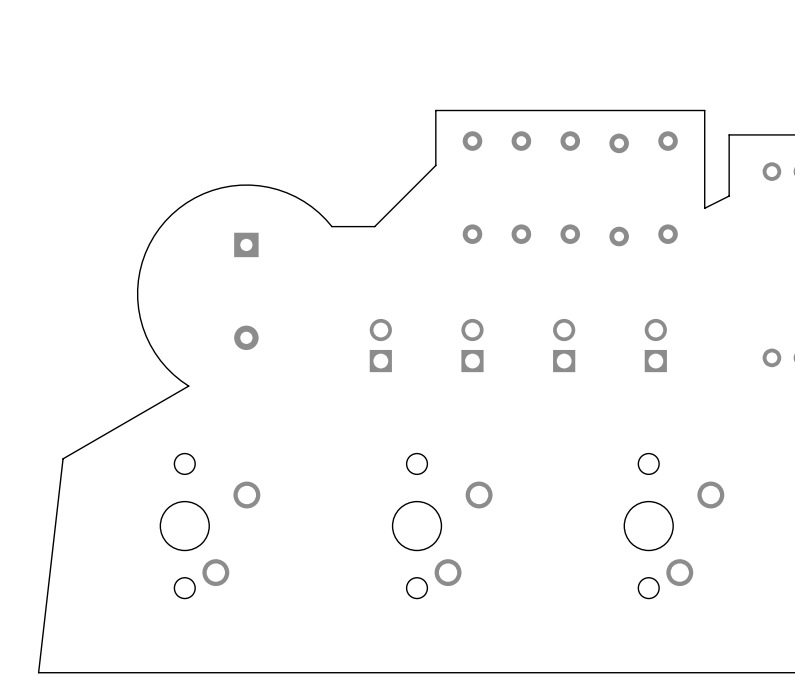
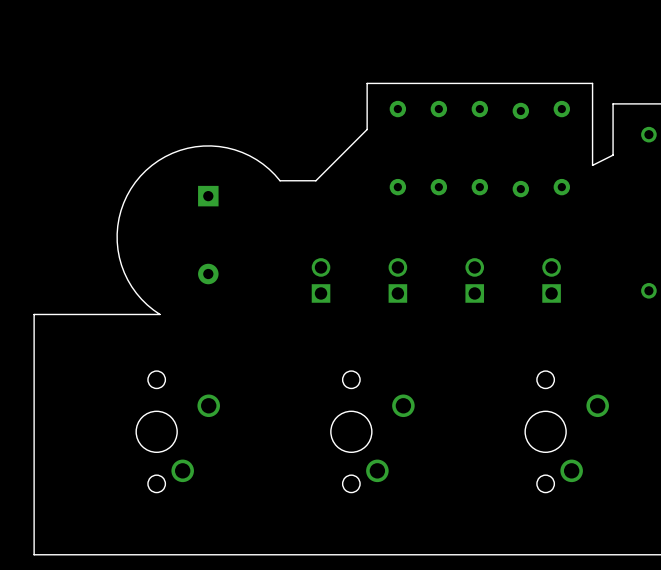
board edge: (188, 386) (63, 458) (38, 672) -> (159, 314) (34, 314) (34, 554)

